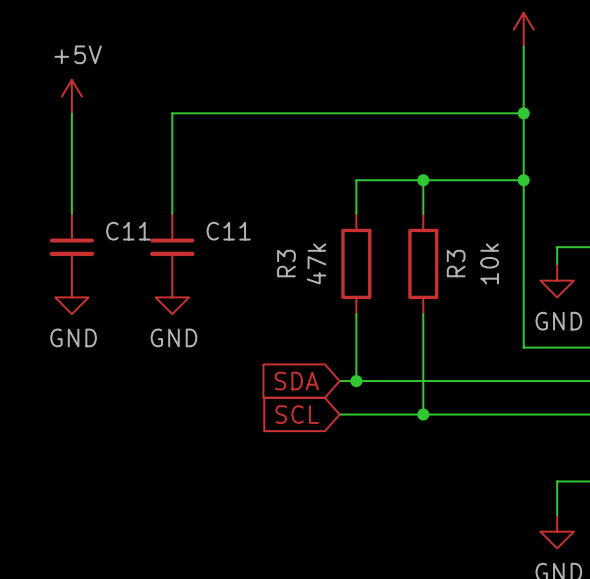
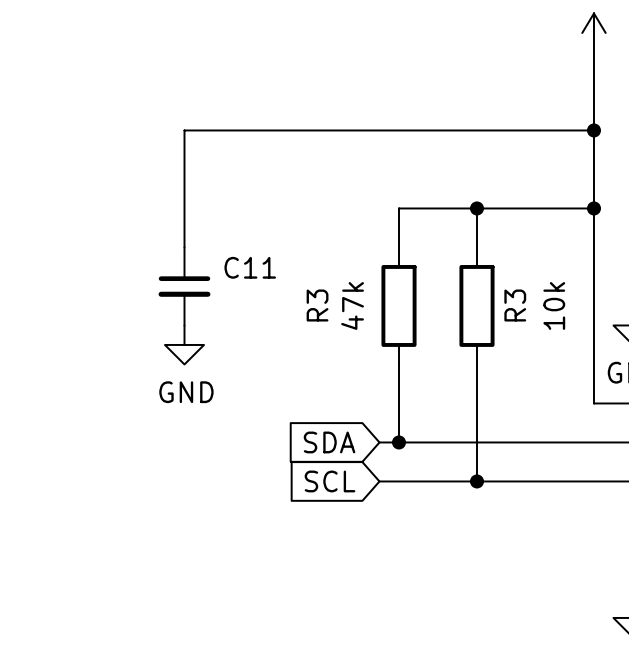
power symbol: +5V (71, 96) -> none
wire: (71, 113) (71, 213) -> none
C11: (71, 247) -> none
power symbol: GND (71, 297) -> none

